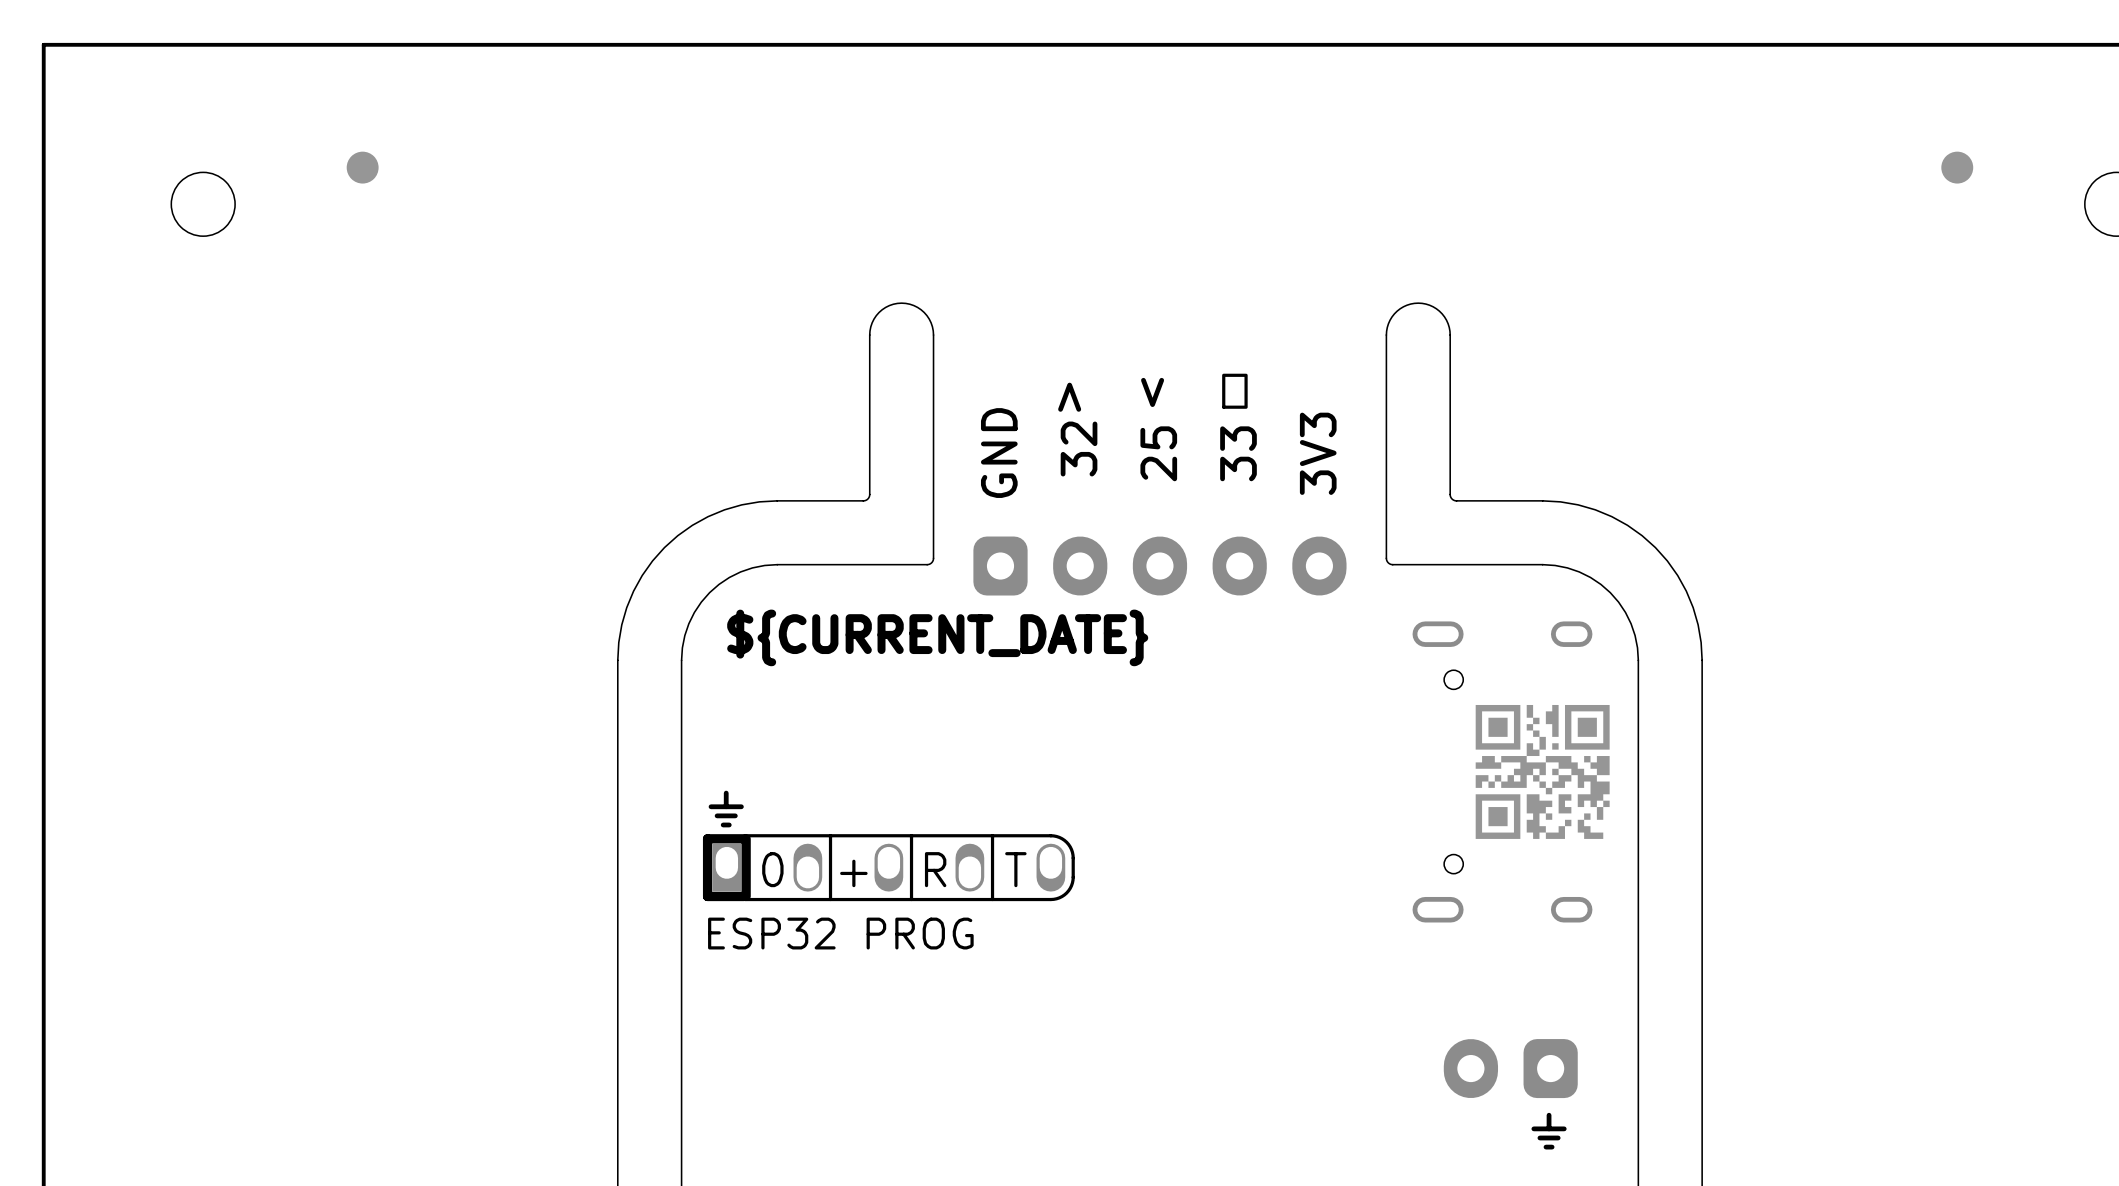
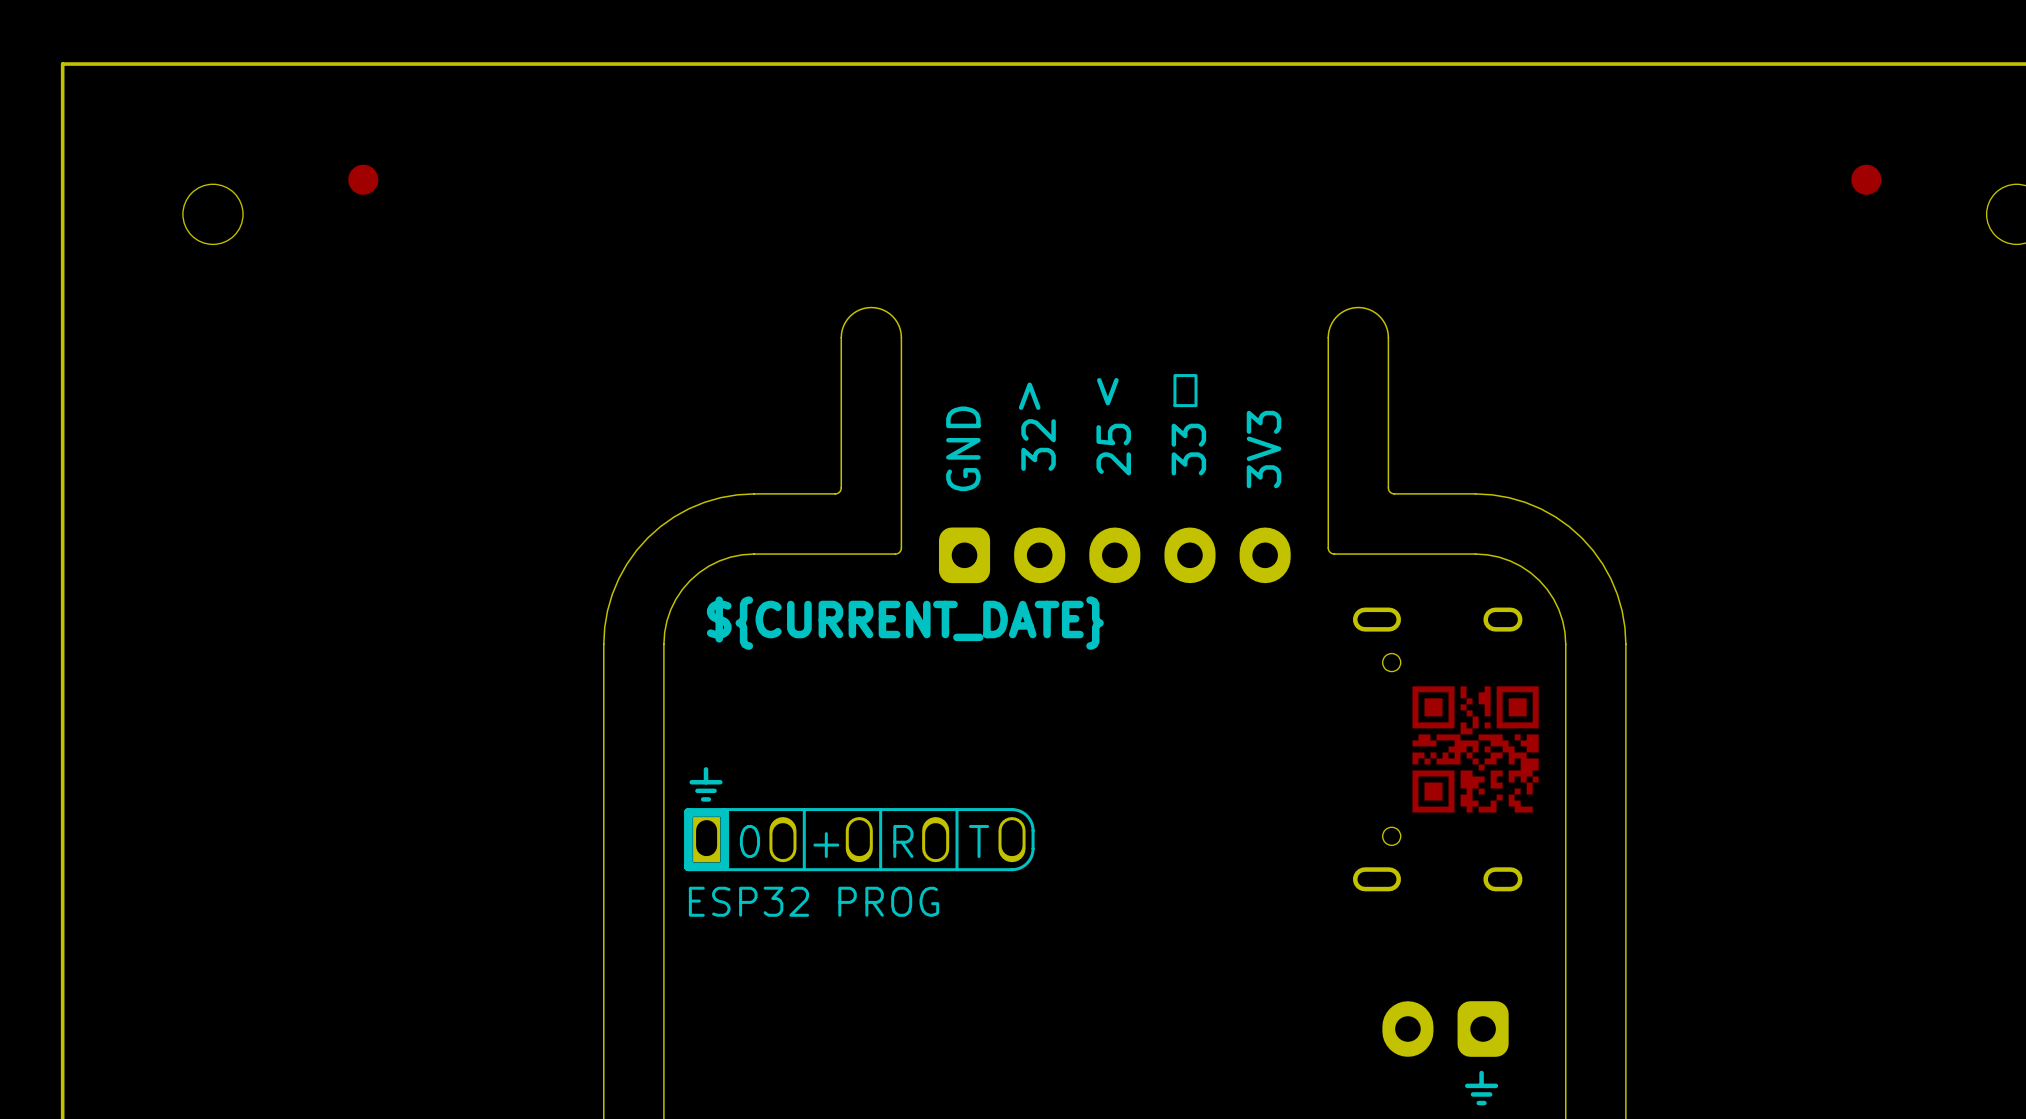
part footprint: [702, 834, 1075, 902] -> [684, 808, 1035, 872]

